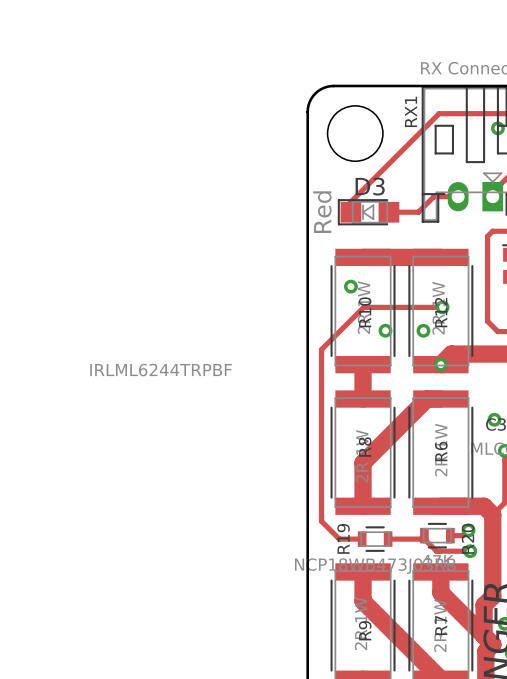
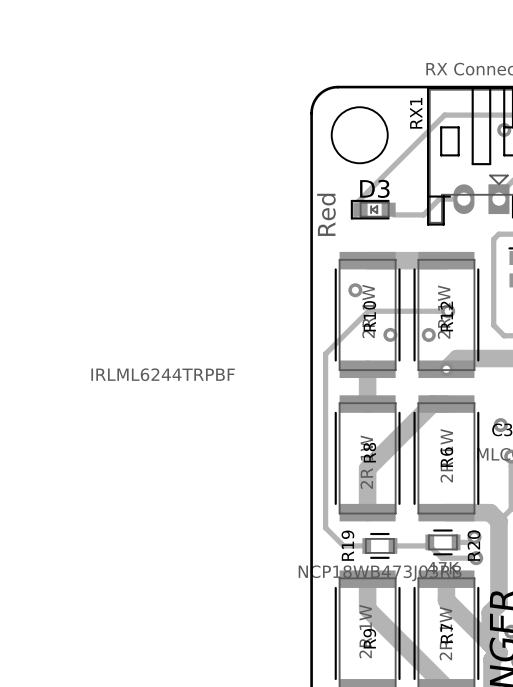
D3 footprint: [337, 199, 400, 226] -> [350, 199, 396, 220]

